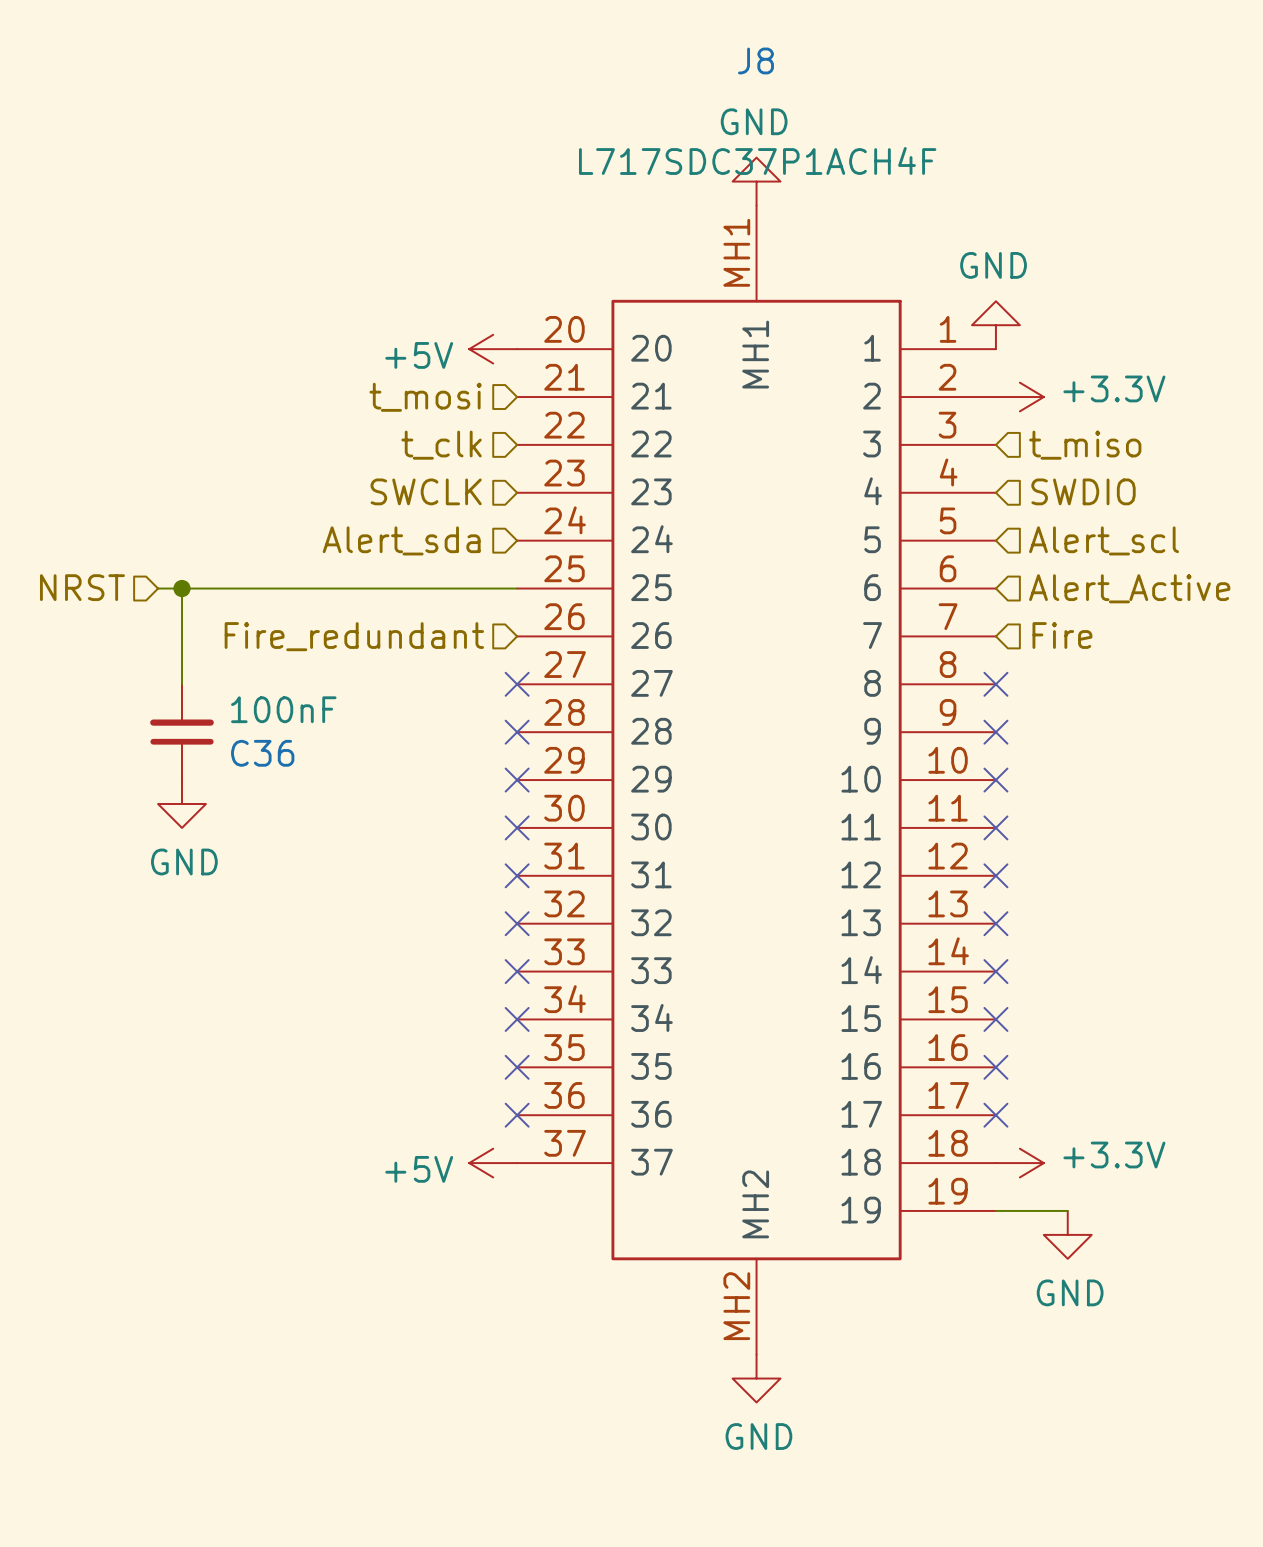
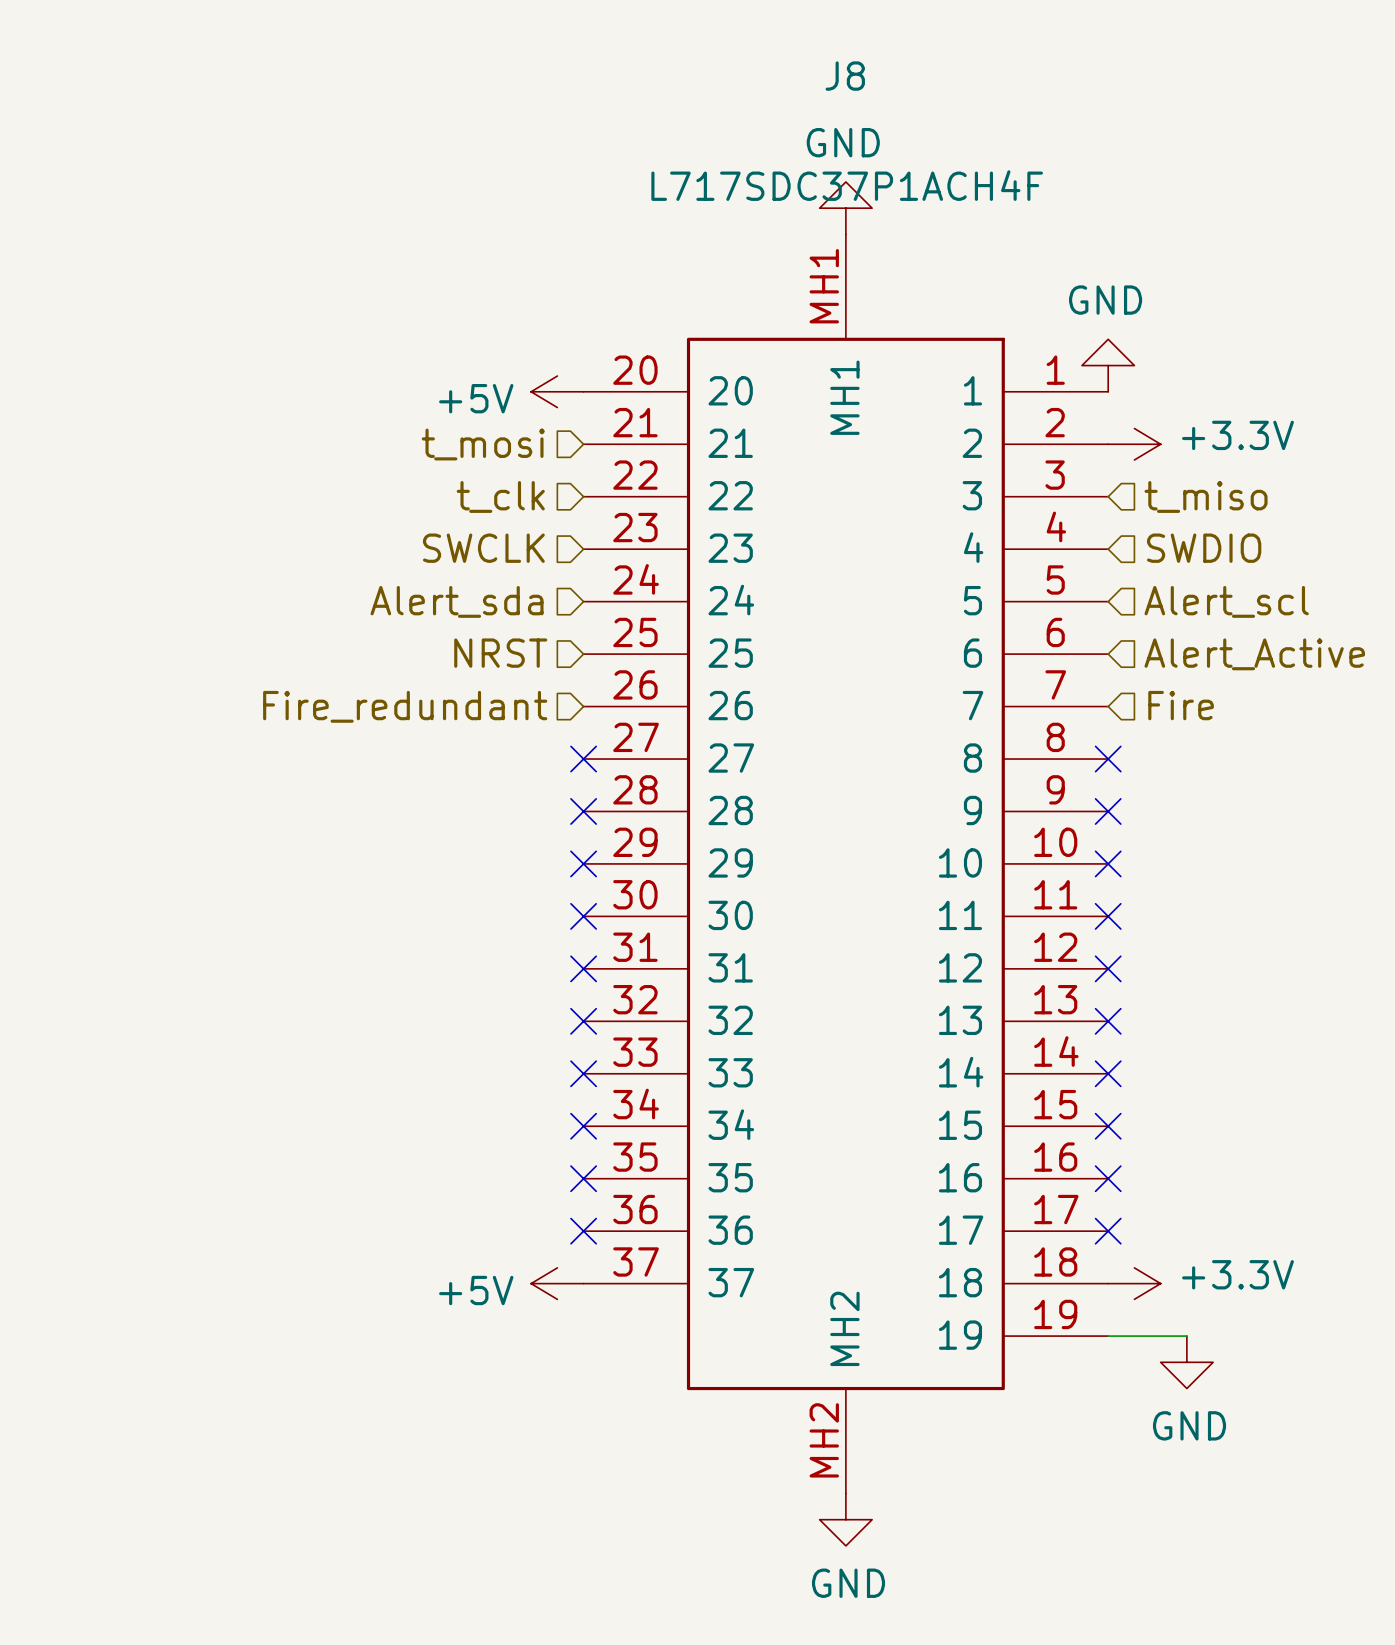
hierarchical label position: NRST (82, 587) -> NRST (500, 653)
wire: (158, 588) (517, 588) -> none
wire: (182, 588) (182, 684) -> none
junction: (182, 588) -> none
C36: 100nF (182, 732) -> none
power symbol: GND (182, 803) -> none

